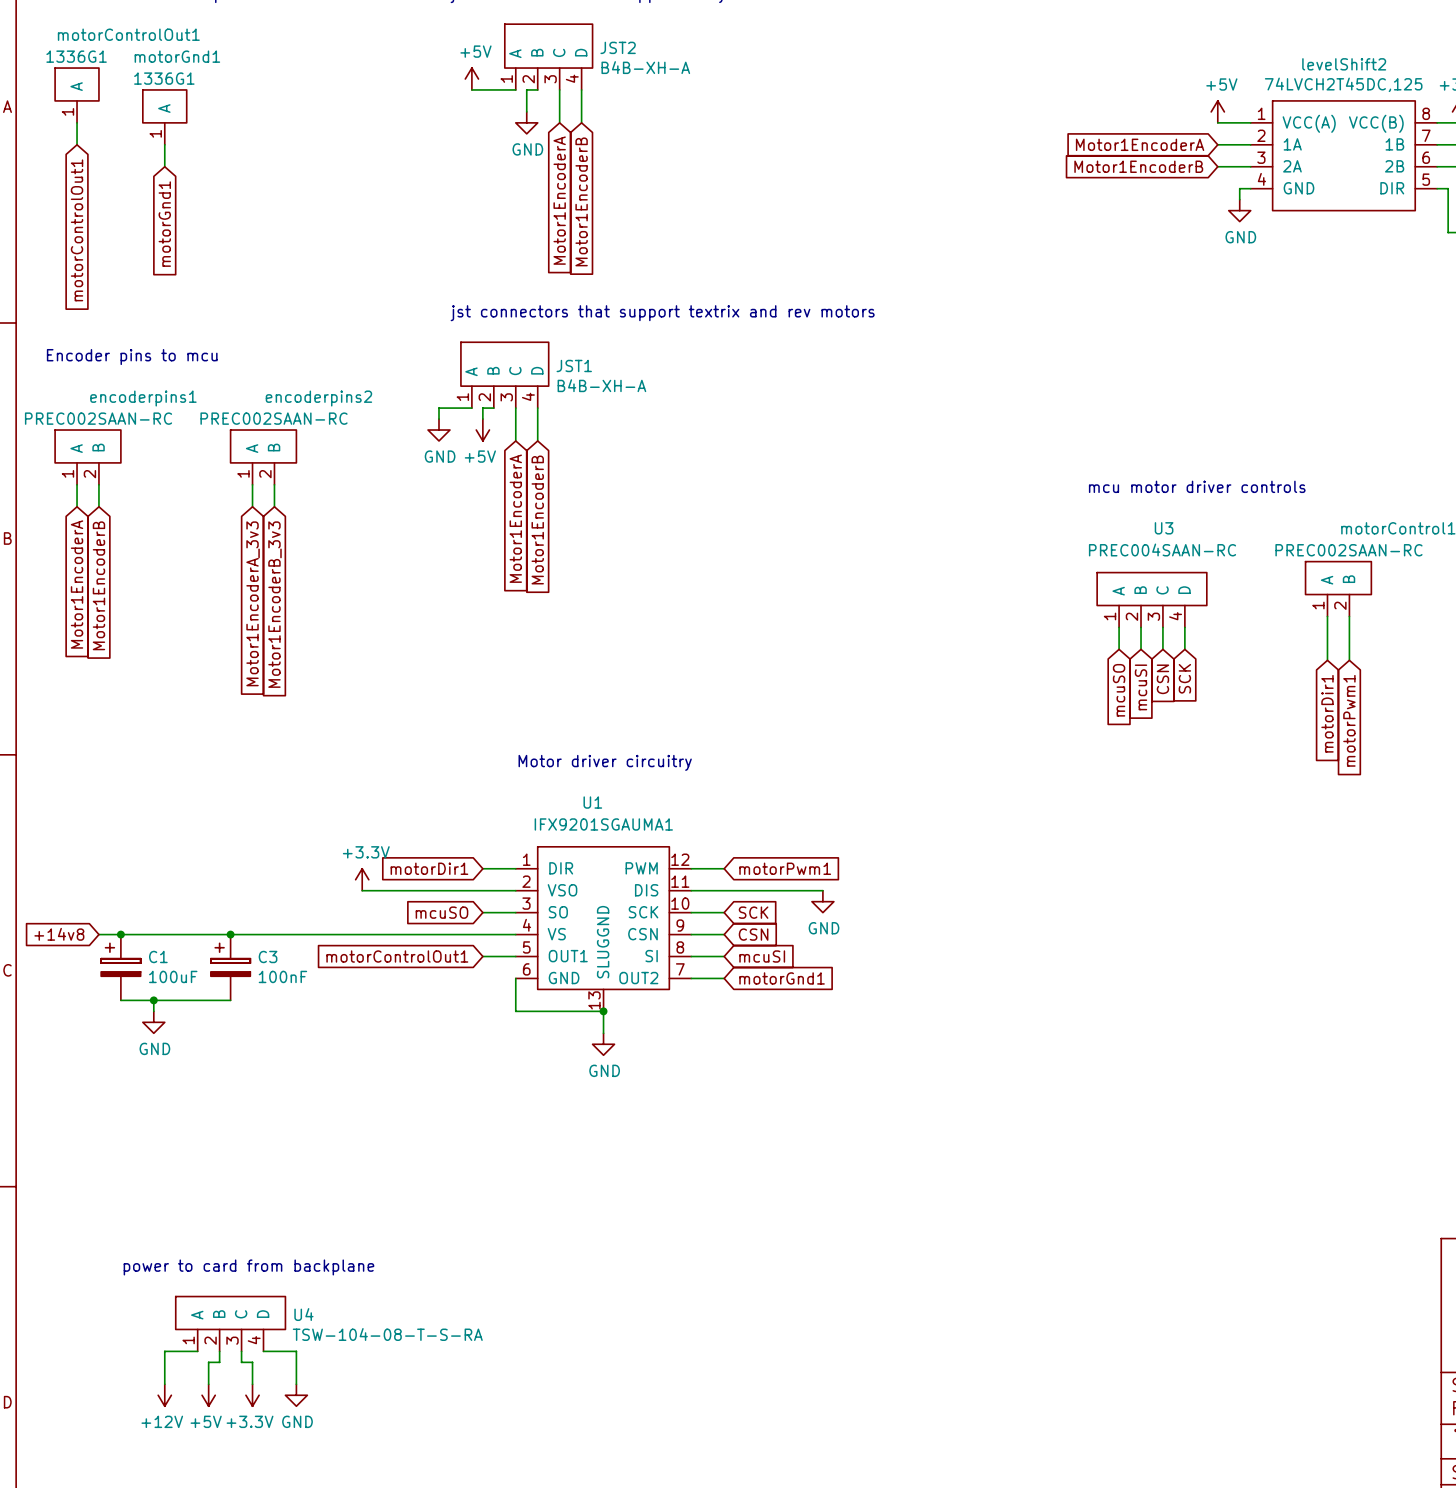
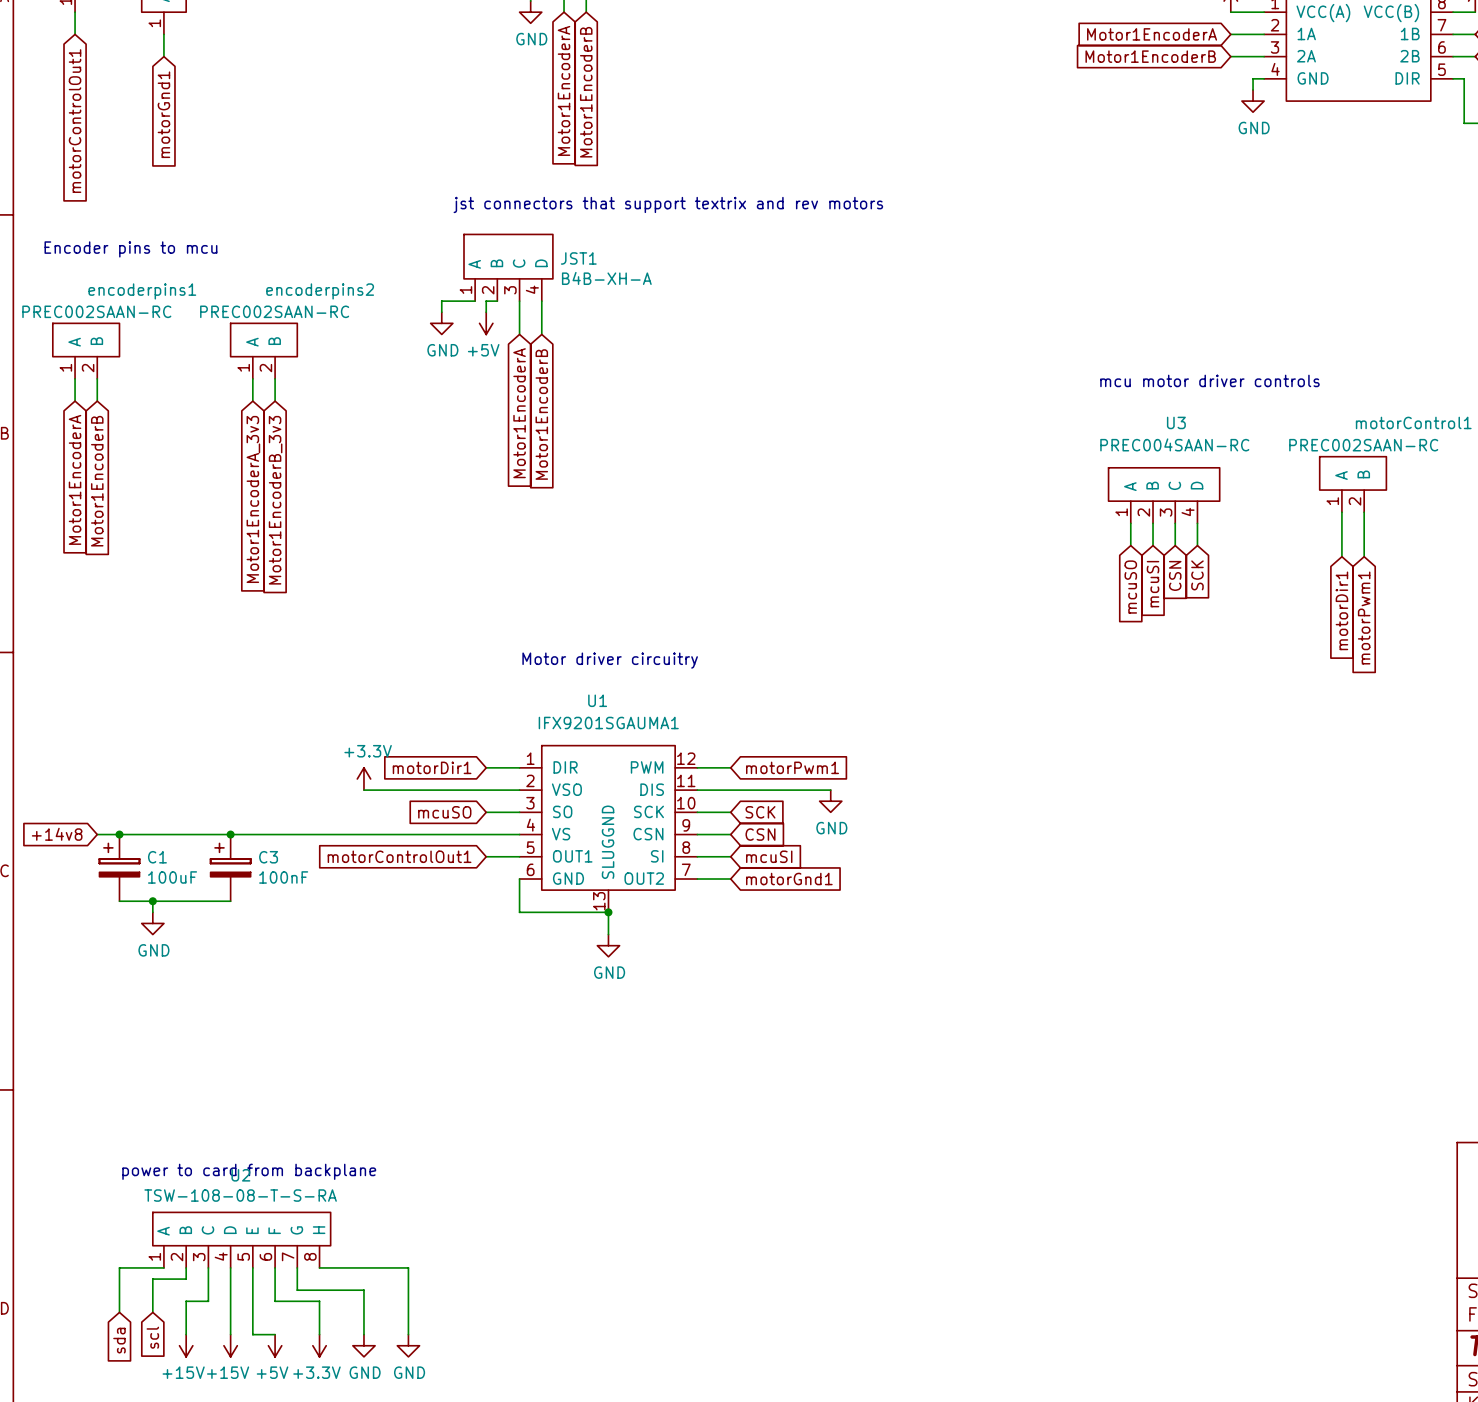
U4: TSW-104-08-T-S-RA (230, 1323) -> none
U2: none -> TSW-108-08-T-S-RA (241, 1240)
wire: (197, 1351) (164, 1351) (164, 1384) -> none
wire: (219, 1351) (219, 1362) (208, 1362) -> none
wire: (241, 1351) (241, 1362) (252, 1362) -> none
wire: (263, 1351) (296, 1351) (296, 1362) -> none
wire: none -> (163, 1267) (119, 1267) (119, 1312)
wire: none -> (186, 1267) (186, 1279) (152, 1279) (152, 1312)
wire: none -> (230, 1267) (230, 1334)
wire: none -> (275, 1267) (275, 1301) (319, 1301) (319, 1334)
wire: none -> (319, 1267) (408, 1267) (408, 1334)
wire: none -> (208, 1290) (208, 1301) (186, 1301) (186, 1334)
wire: none -> (252, 1290) (252, 1334) (275, 1334)
wire: none -> (297, 1290) (363, 1290) (363, 1334)
power symbol: +12V (164, 1395) -> none
power symbol position: +5V (208, 1395) -> +5V (275, 1345)
power symbol position: +3.3V (252, 1395) -> +3.3V (319, 1345)
power symbol: GND (296, 1395) -> none
global label: none -> scl (152, 1337)
global label: none -> sda (119, 1340)
power symbol: none -> +15V (186, 1345)
power symbol: none -> +15V (230, 1345)
power symbol: none -> GND (363, 1345)
power symbol: none -> GND (408, 1345)

